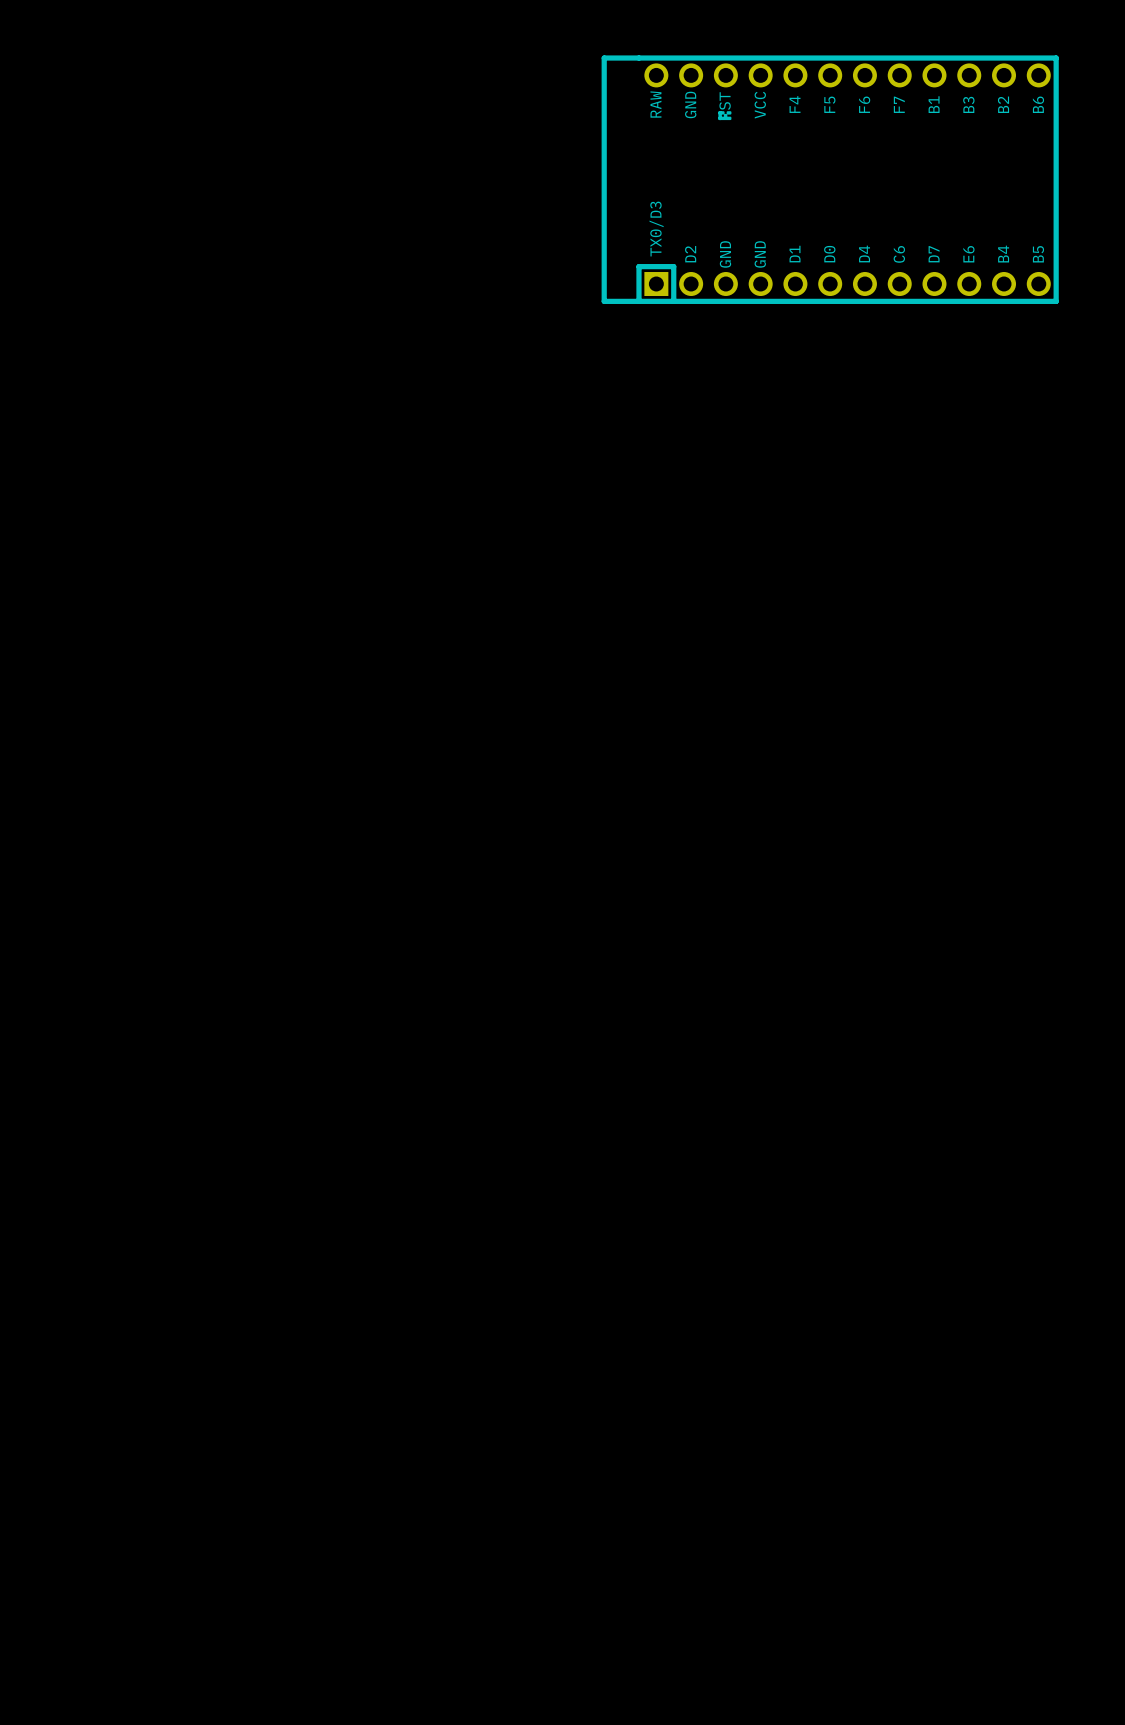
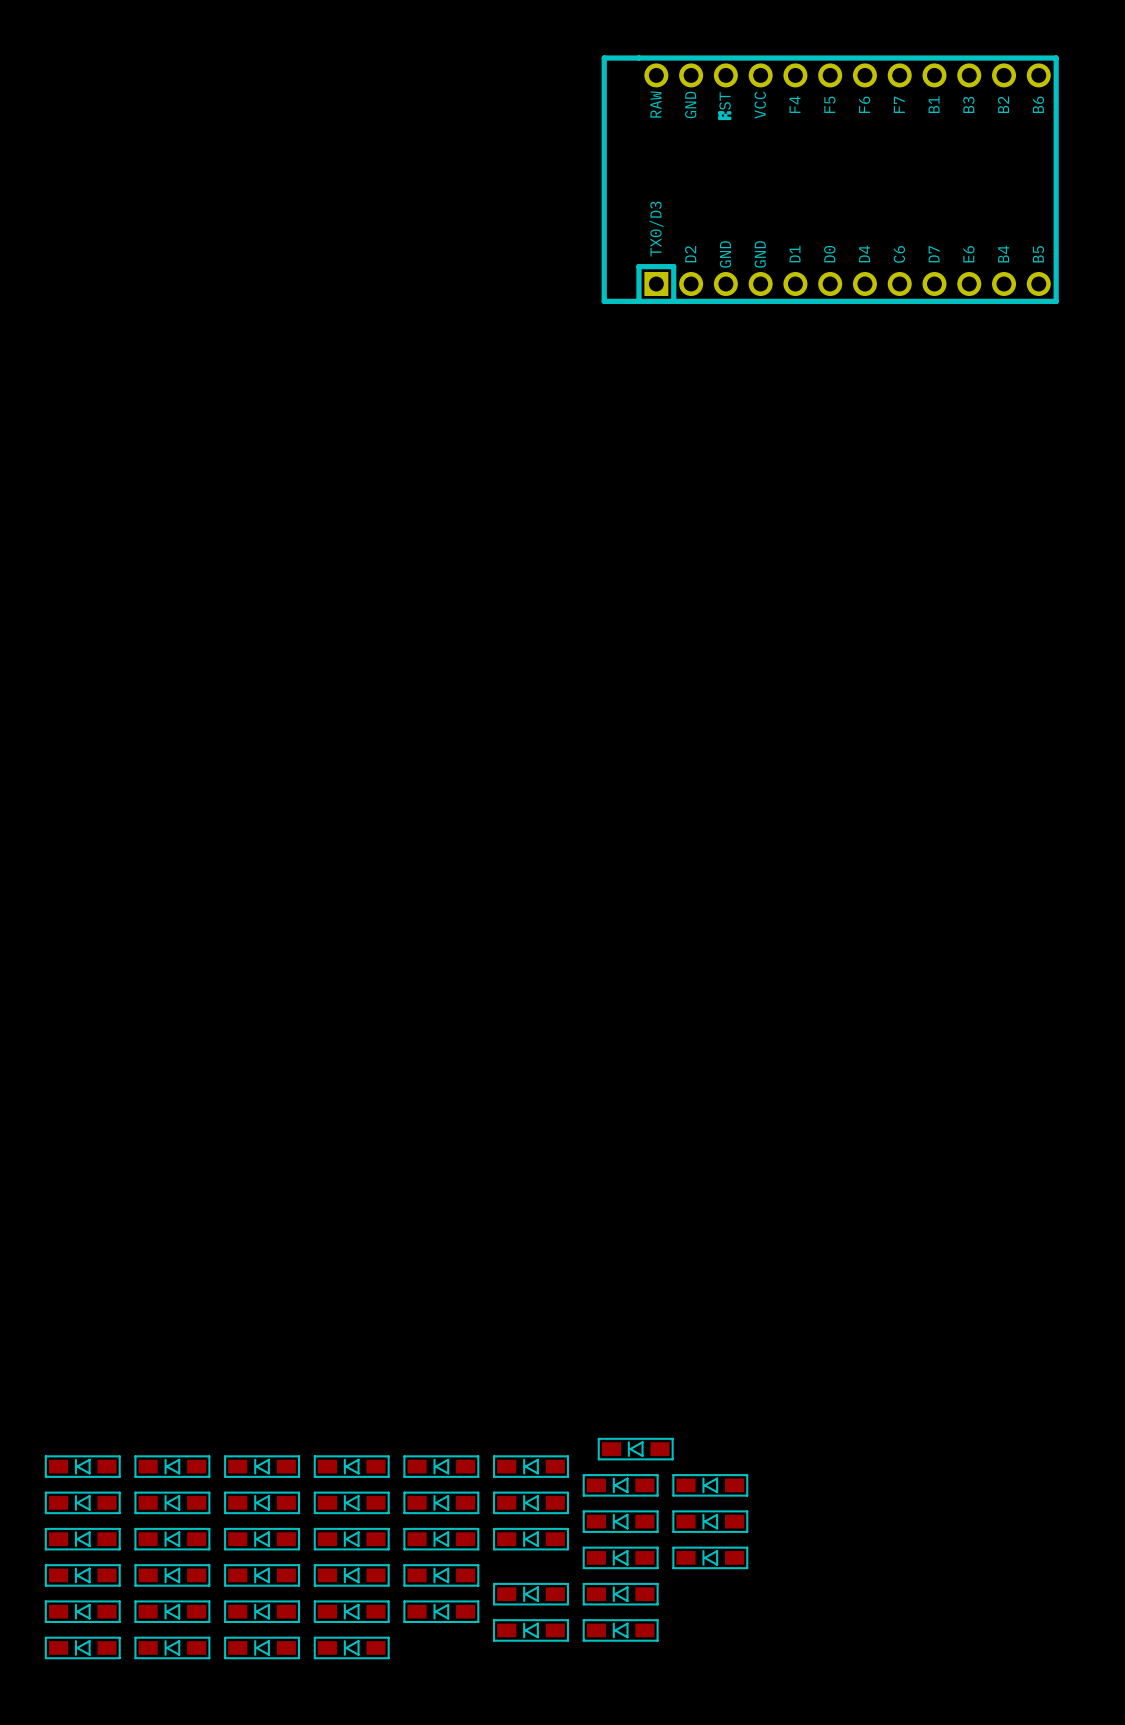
part: none -> (635, 1449)
part: none -> (82, 1466)
part: none -> (172, 1466)
part: none -> (262, 1466)
part: none -> (351, 1466)
part: none -> (441, 1466)
part: none -> (531, 1466)
part: none -> (620, 1485)
part: none -> (710, 1485)
part: none -> (82, 1502)
part: none -> (172, 1502)
part: none -> (262, 1502)
part: none -> (351, 1502)
part: none -> (441, 1502)
part: none -> (531, 1502)
part: none -> (620, 1521)
part: none -> (710, 1521)
part: none -> (82, 1539)
part: none -> (172, 1539)
part: none -> (262, 1539)
part: none -> (351, 1539)
part: none -> (441, 1539)
part: none -> (531, 1539)
part: none -> (620, 1557)
part: none -> (710, 1557)
part: none -> (82, 1575)
part: none -> (172, 1575)
part: none -> (262, 1575)
part: none -> (351, 1575)
part: none -> (441, 1575)
part: none -> (531, 1594)
part: none -> (620, 1594)
part: none -> (82, 1611)
part: none -> (172, 1611)
part: none -> (262, 1611)
part: none -> (351, 1611)
part: none -> (441, 1611)
part: none -> (531, 1630)
part: none -> (620, 1630)
part: none -> (82, 1647)
part: none -> (172, 1647)
part: none -> (262, 1647)
part: none -> (351, 1647)

